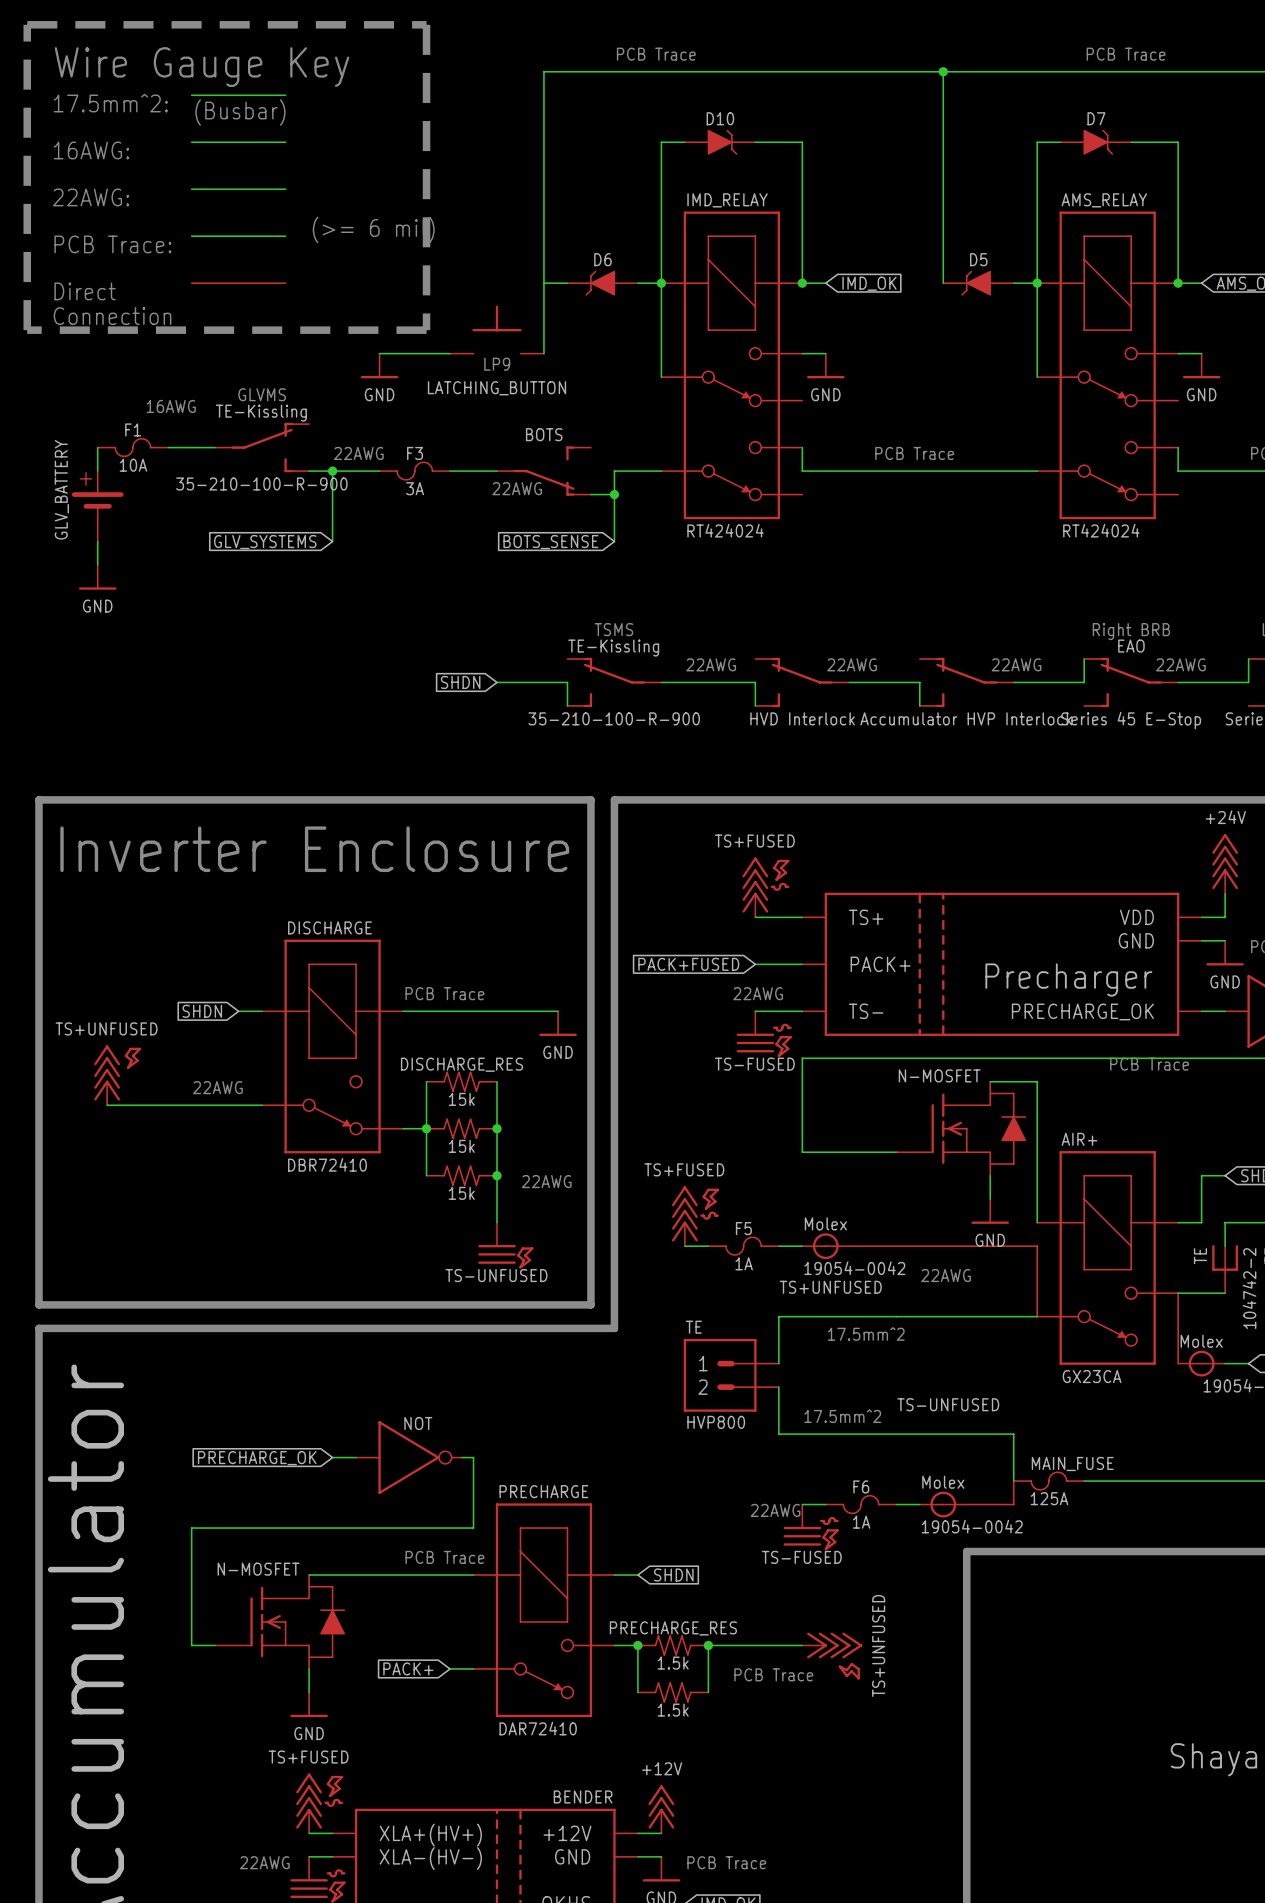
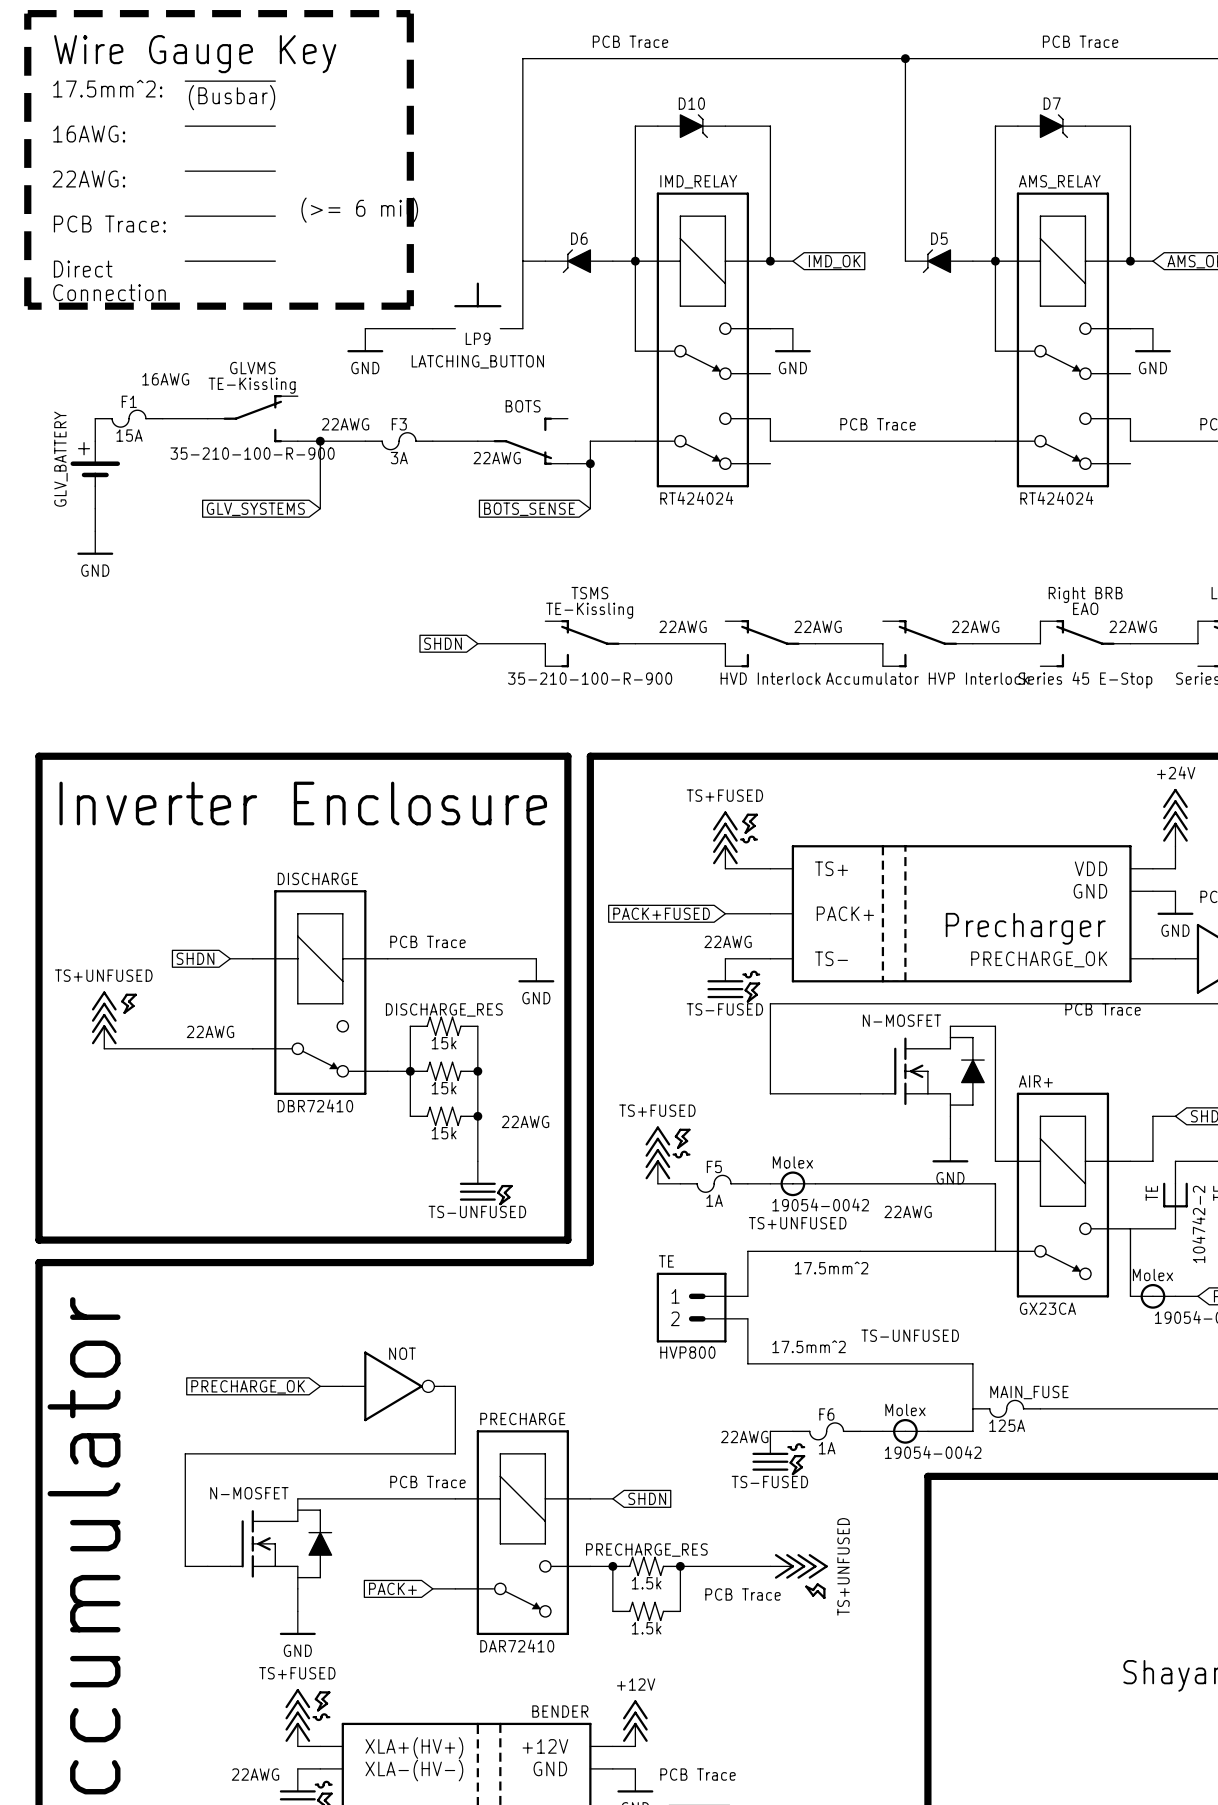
F1 value: 10A (133, 465) -> 15A (129, 435)

